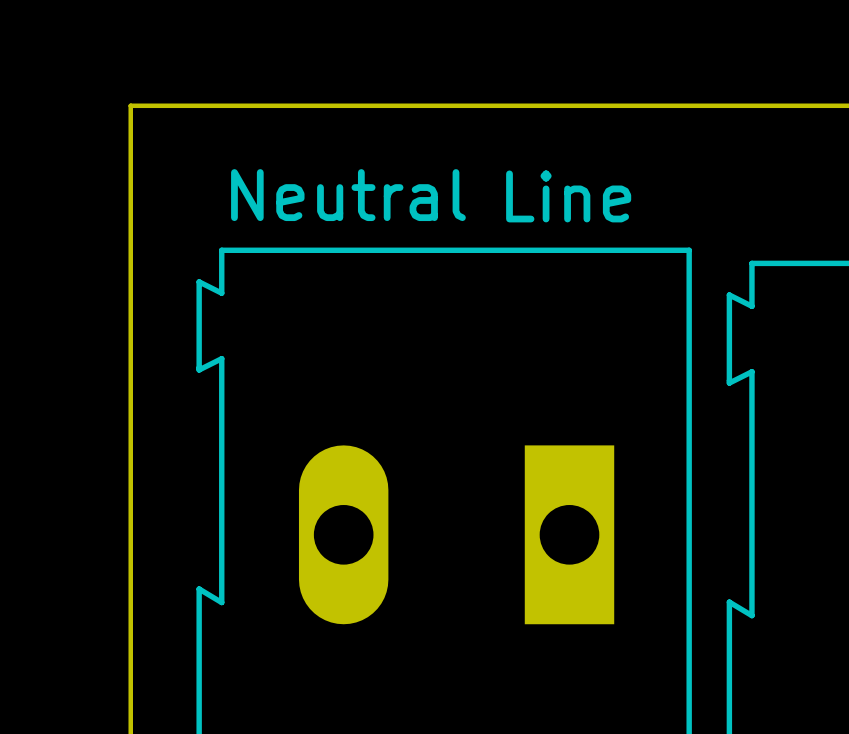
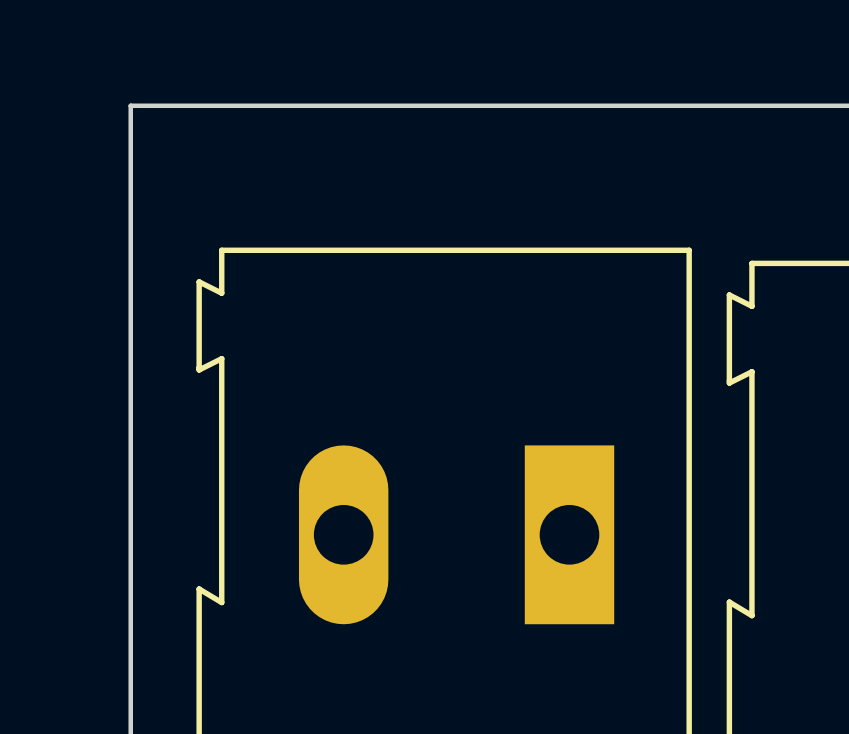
text: Neutral (348, 195) -> none
text: Line (568, 196) -> none

